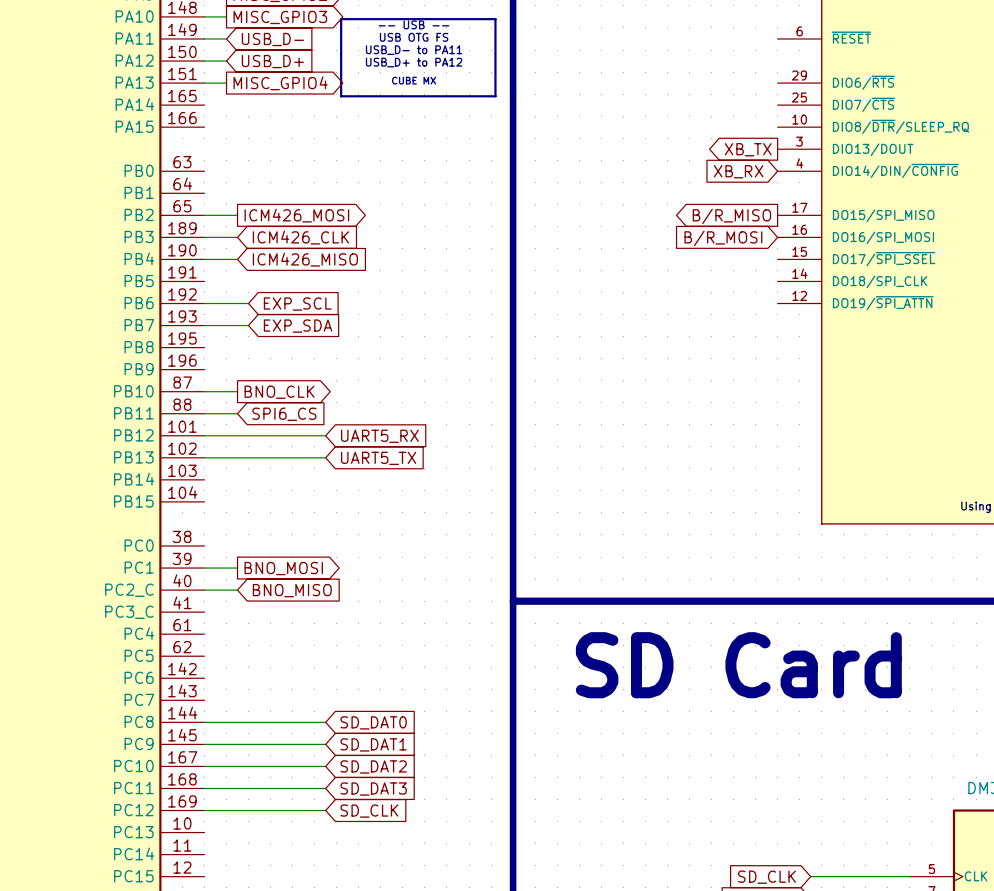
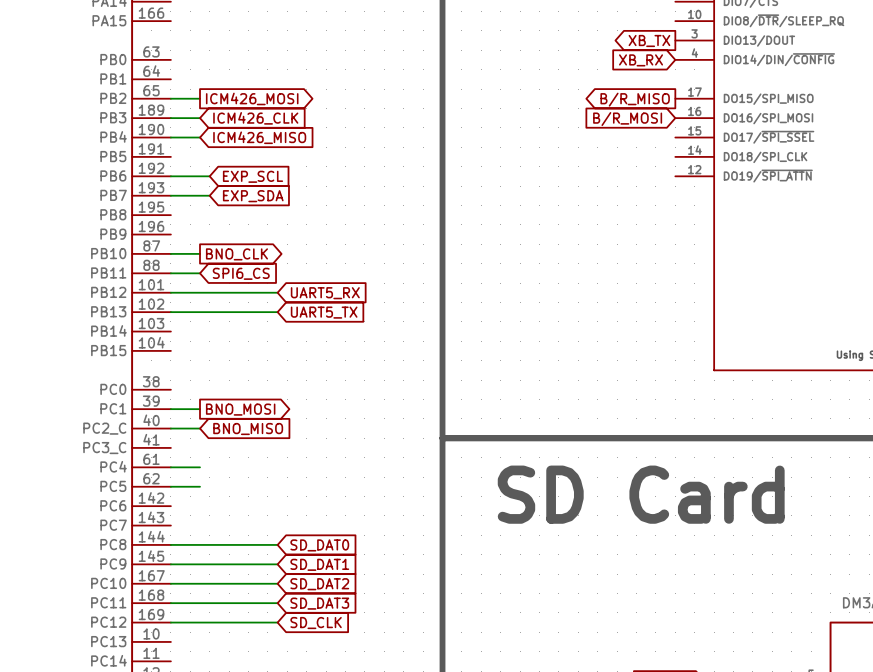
wire: none -> (170, 467) (200, 467)
wire: none -> (170, 486) (200, 486)

